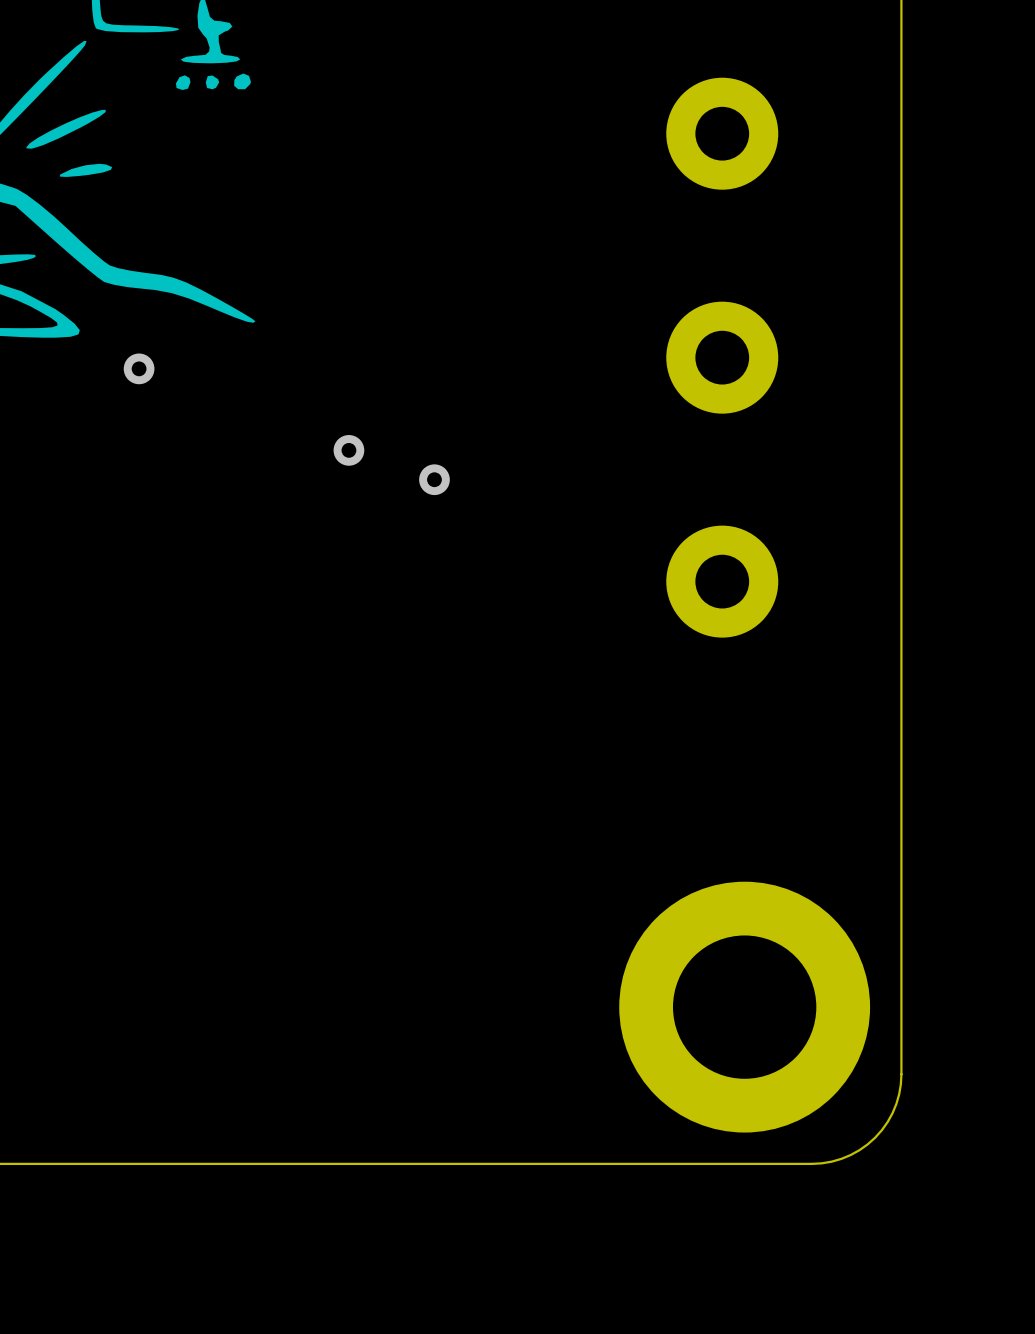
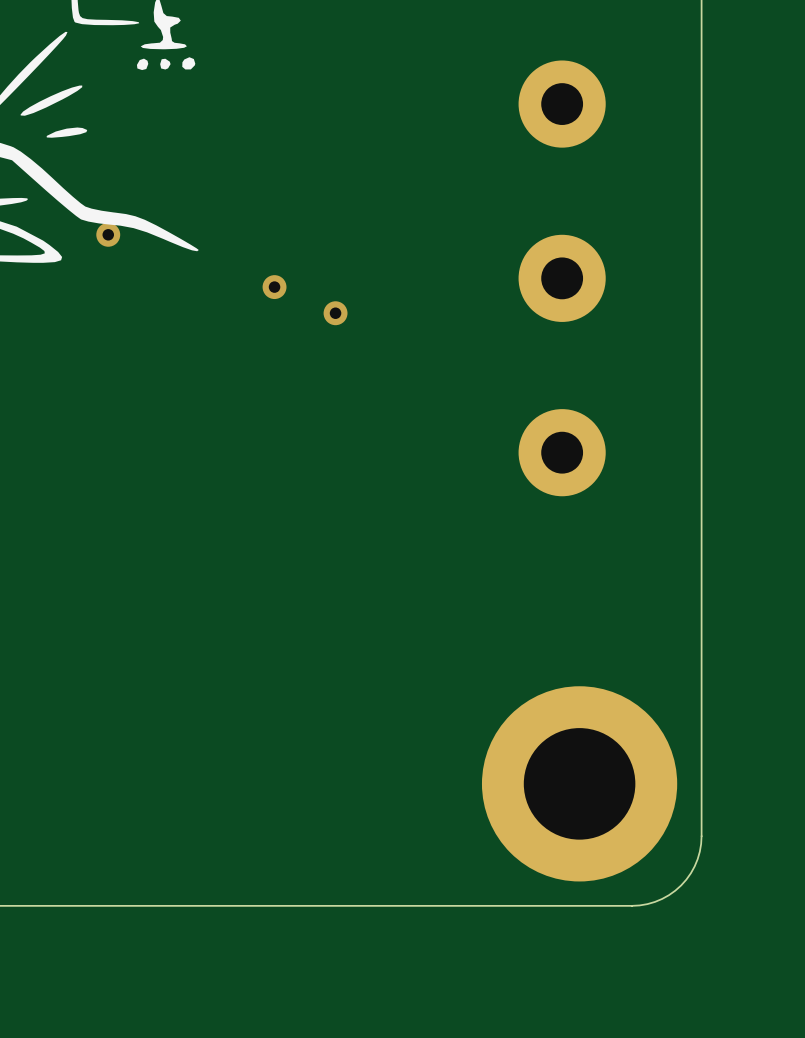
via position: (139, 368) -> (108, 234)
via: none -> (274, 287)
via: none -> (335, 313)
via: (348, 450) -> none
via: (434, 479) -> none

